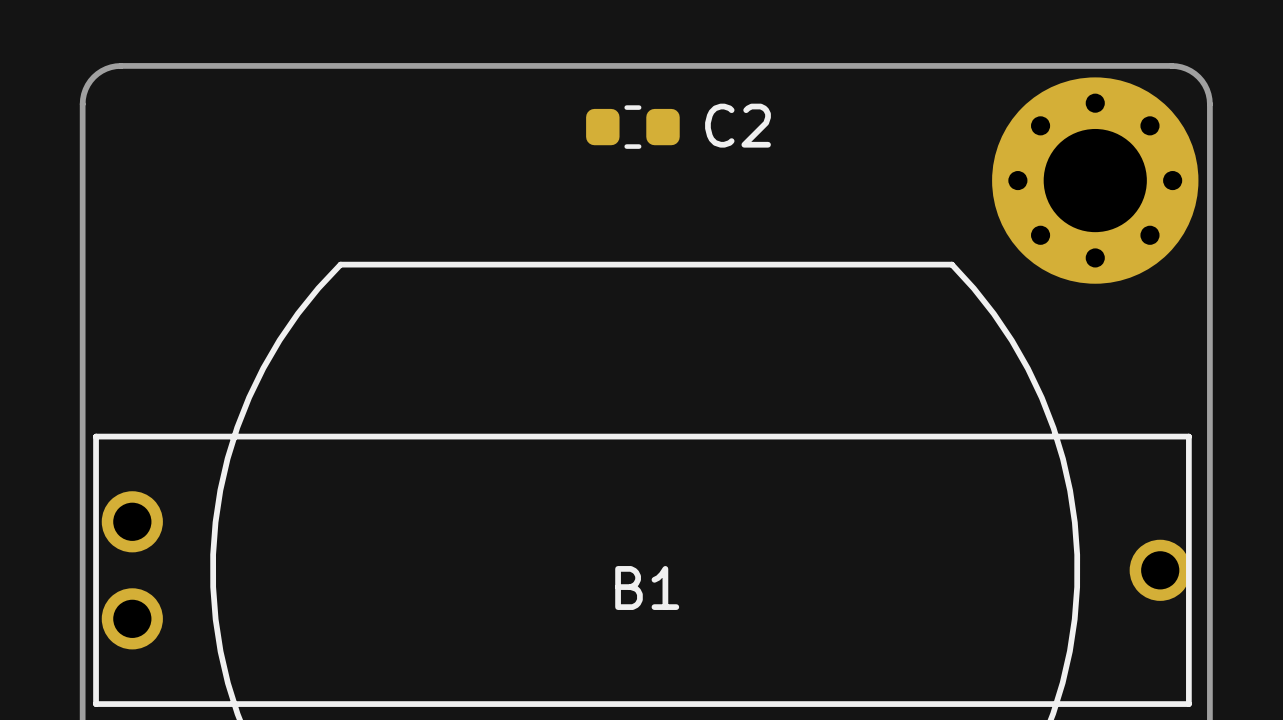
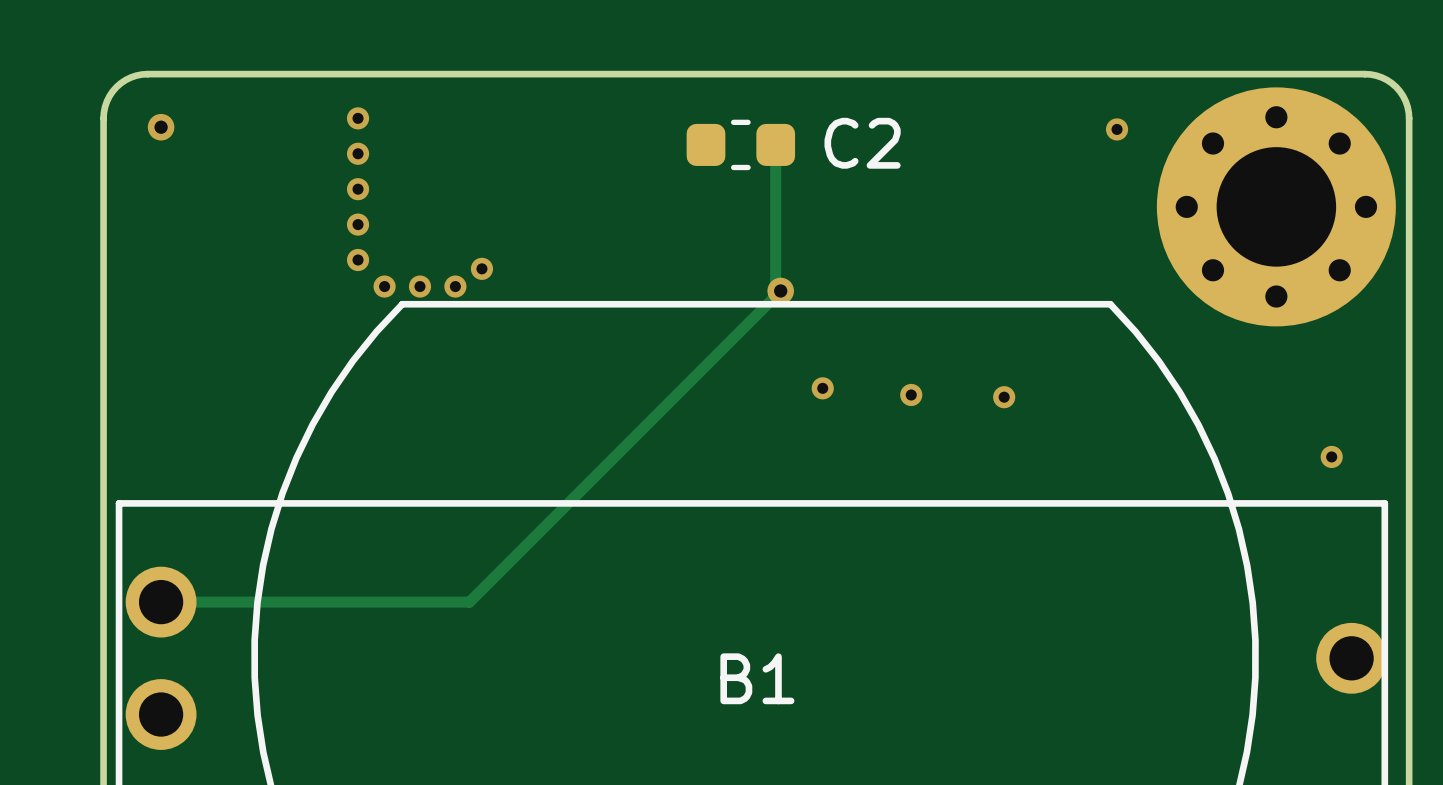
via: none -> (358, 118)
via: none -> (161, 127)
via: none -> (1117, 129)
track: none -> (775, 144) (775, 286) (780, 290) (469, 602) (161, 602)
via: none -> (358, 153)
via: none -> (358, 189)
via: none -> (358, 224)
via: none -> (358, 259)
via: none -> (481, 268)
via: none -> (384, 286)
via: none -> (419, 286)
via: none -> (455, 286)
via: none -> (780, 290)
via: none -> (822, 388)
via: none -> (911, 394)
via: none -> (1004, 397)
via: none -> (1331, 456)

